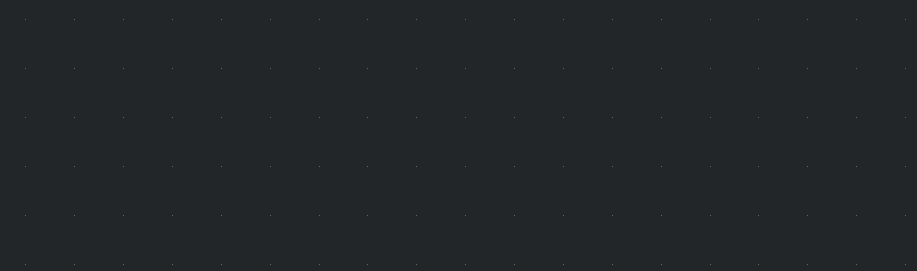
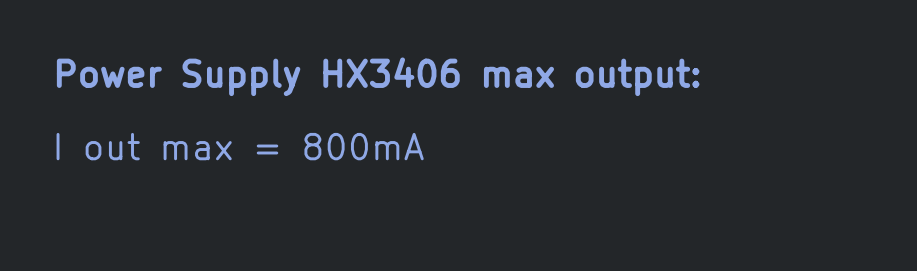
text: none -> Power Supply HX3406 max output: (378, 76)
text: none -> I out max = 800mA (240, 146)

